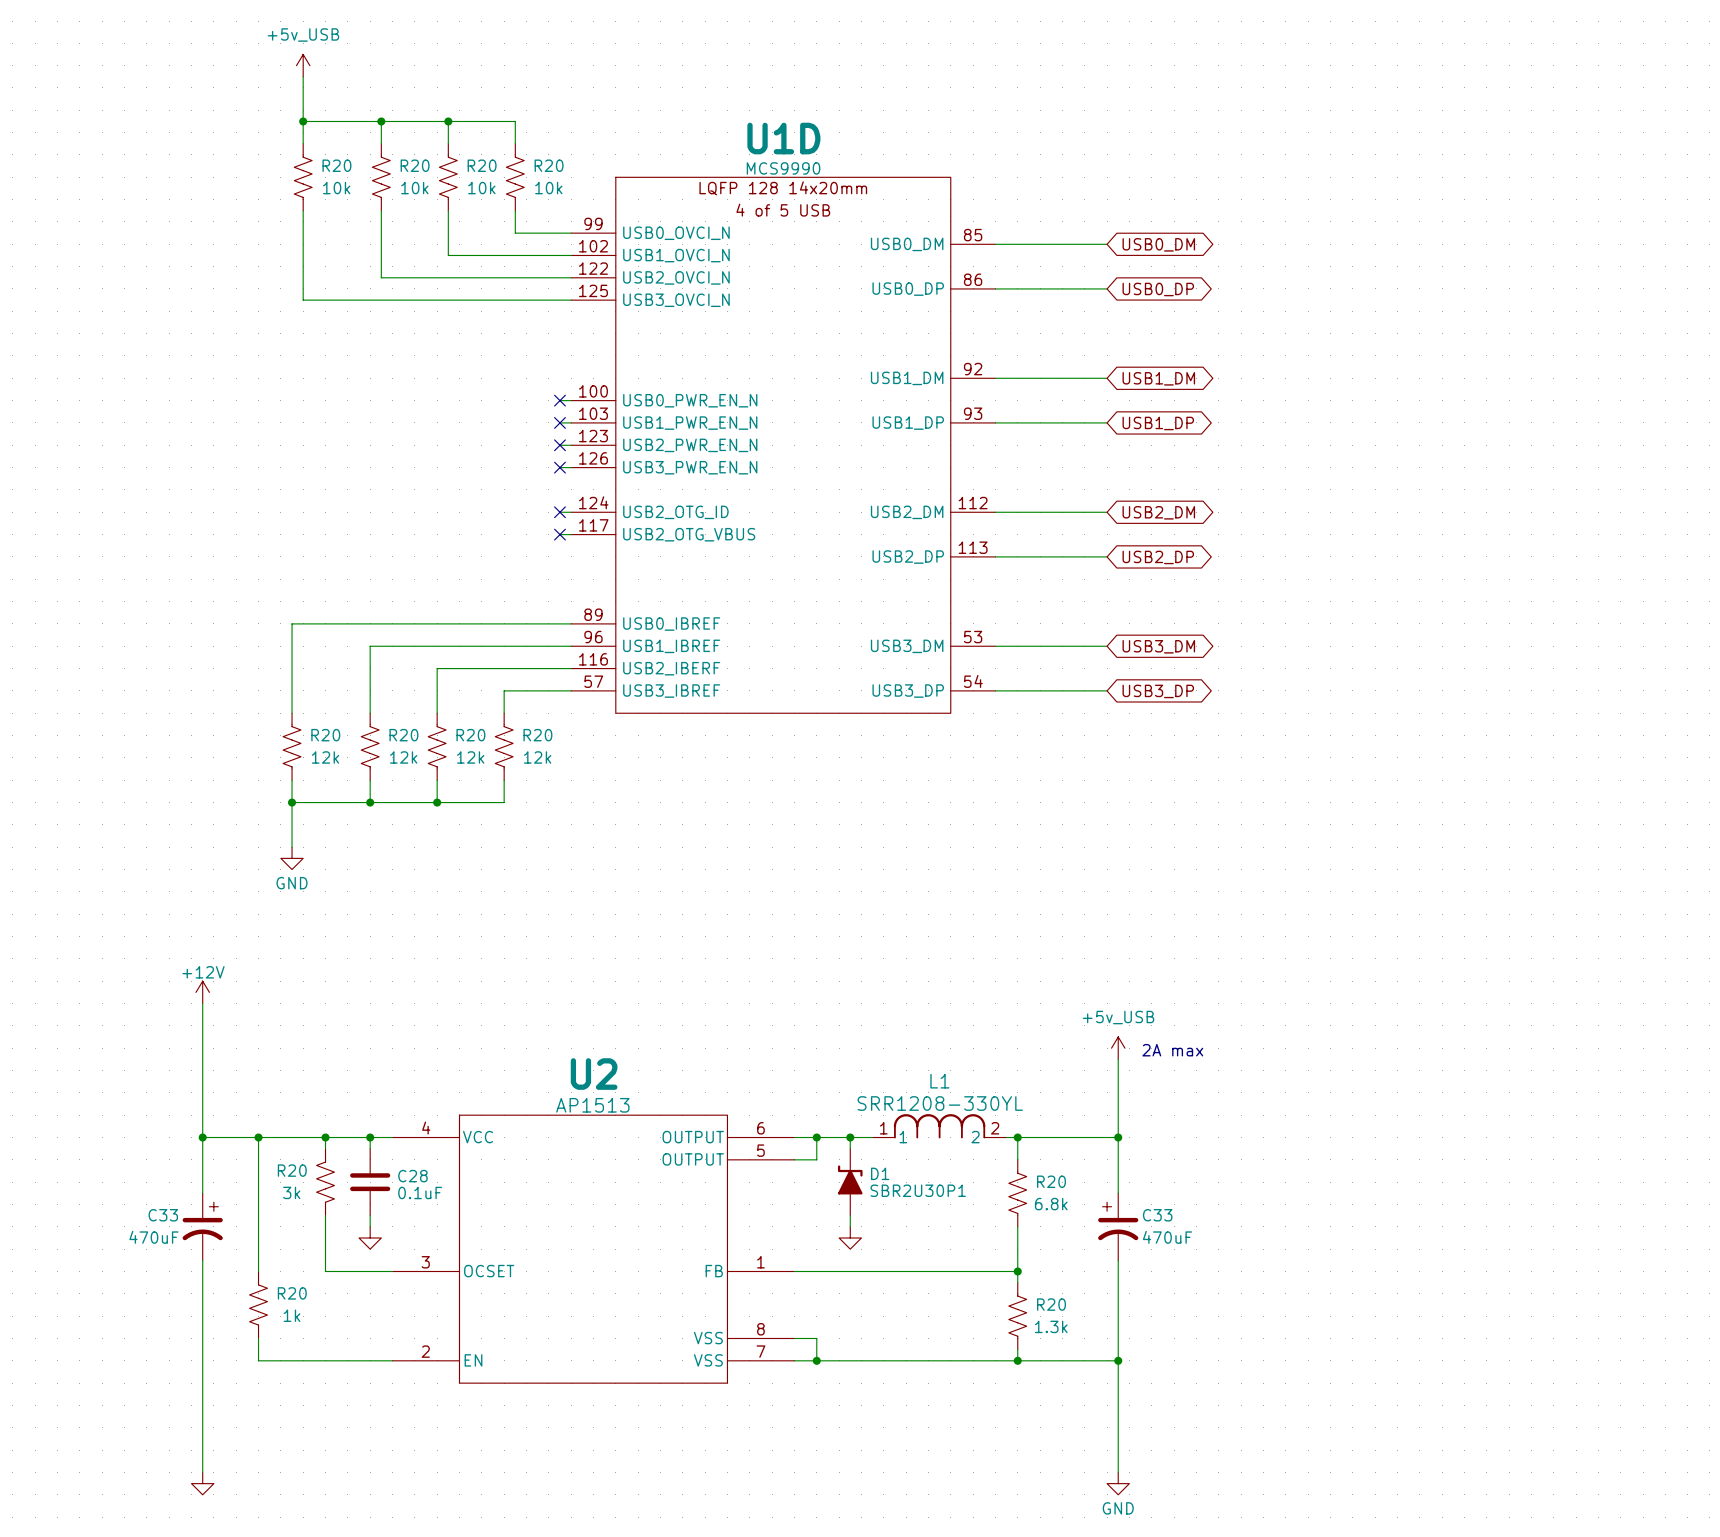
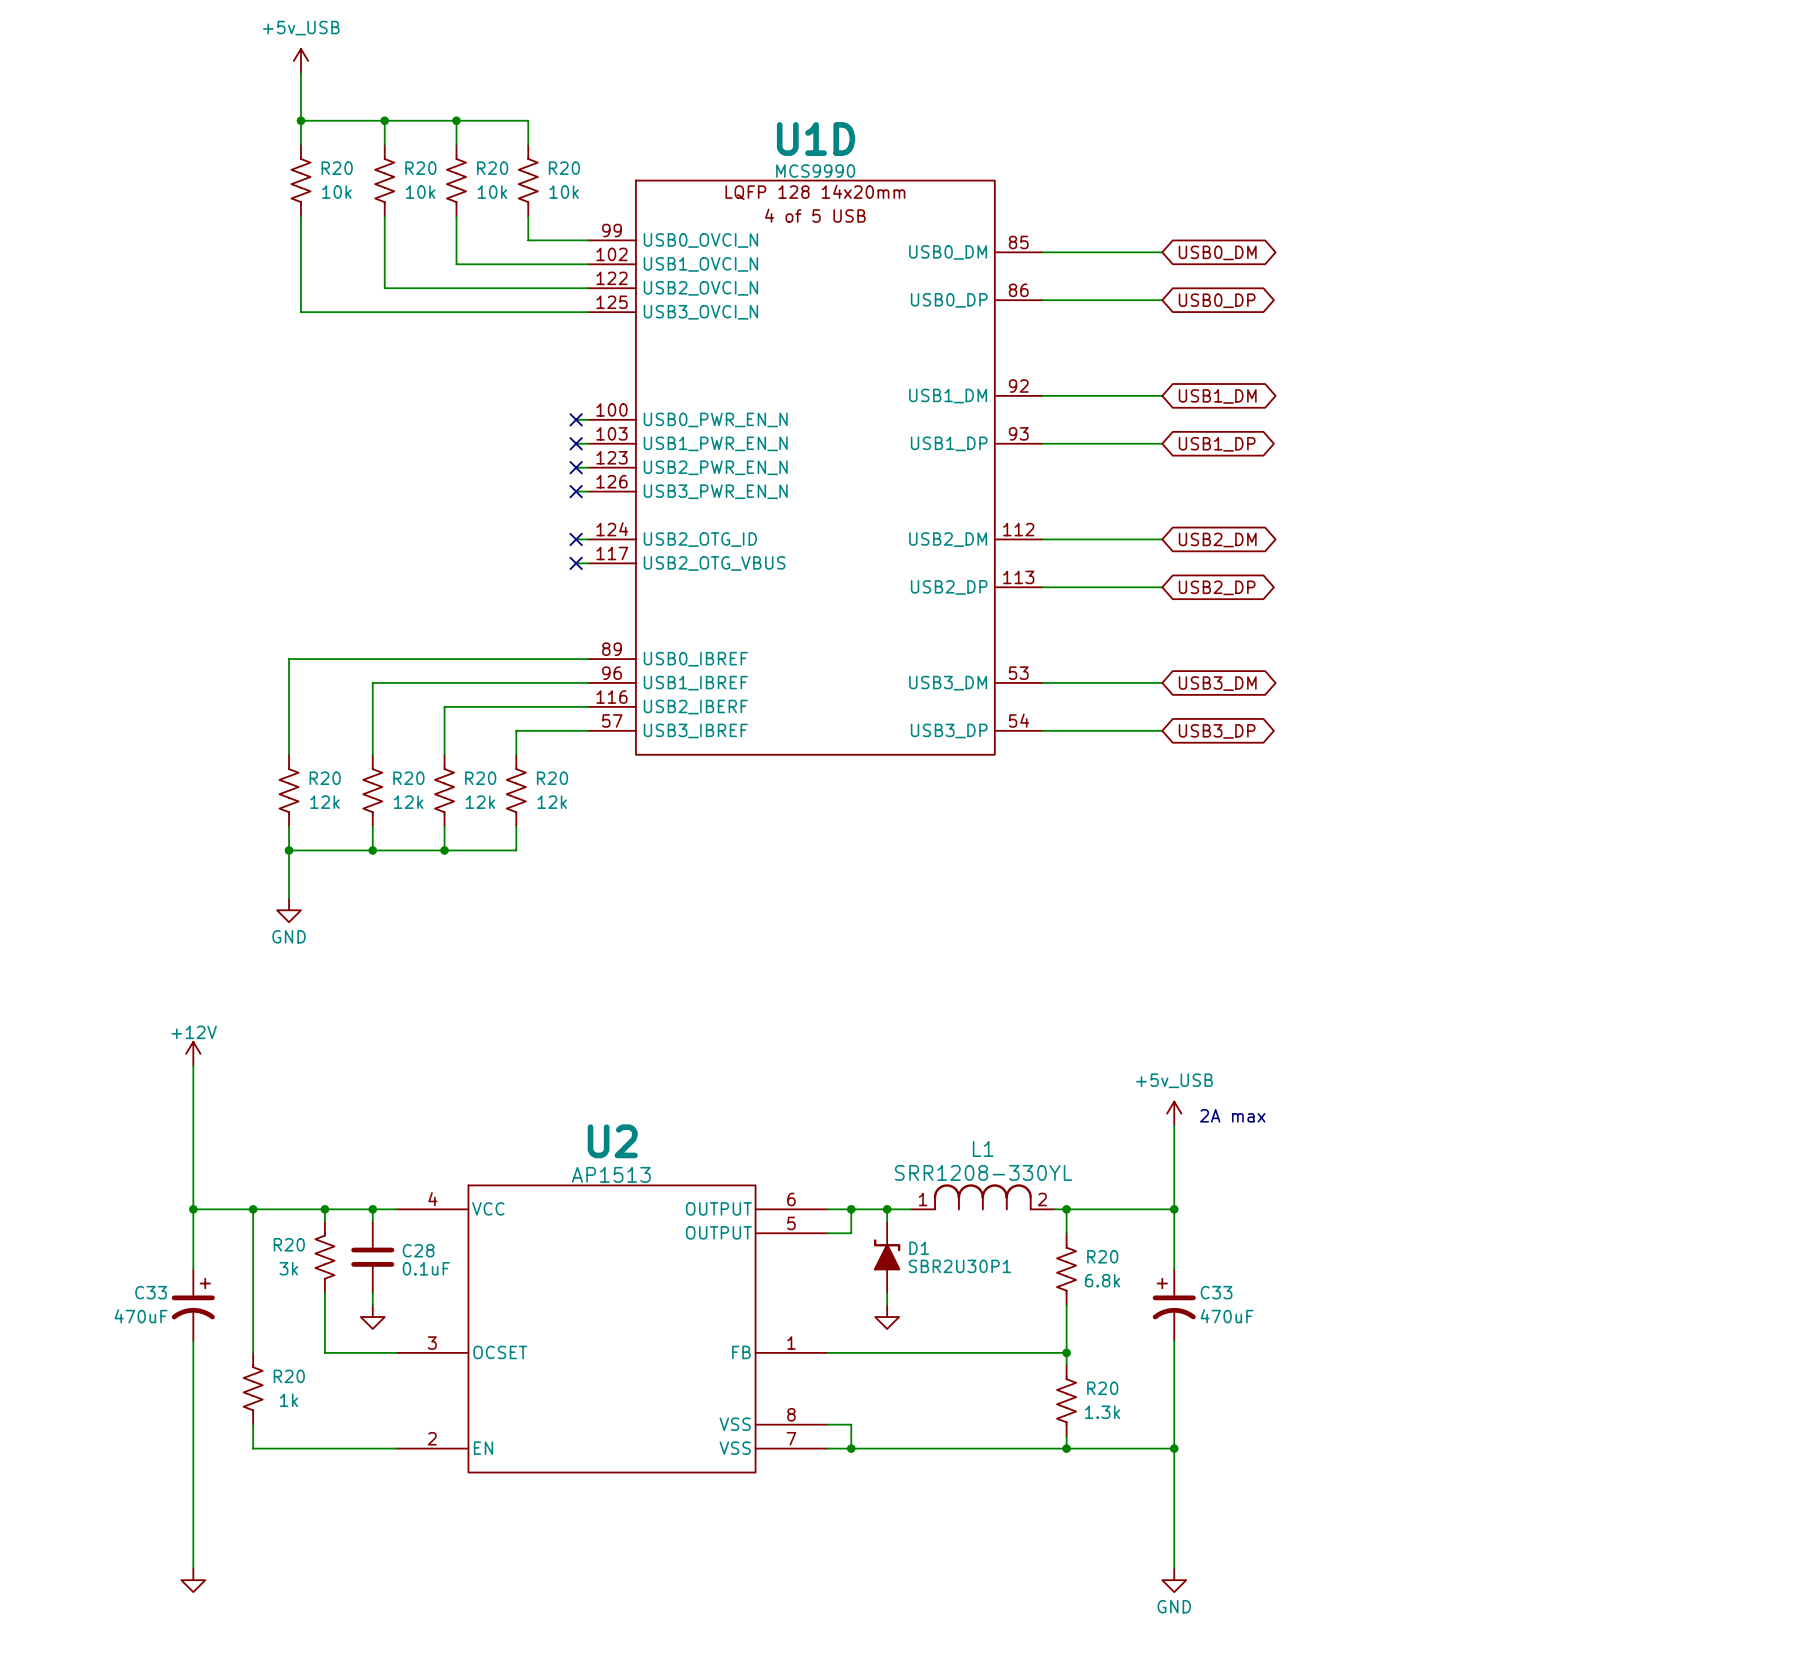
L1 pin name: 1 (903, 1137) -> none
L1 pin name: 2 (975, 1137) -> none

